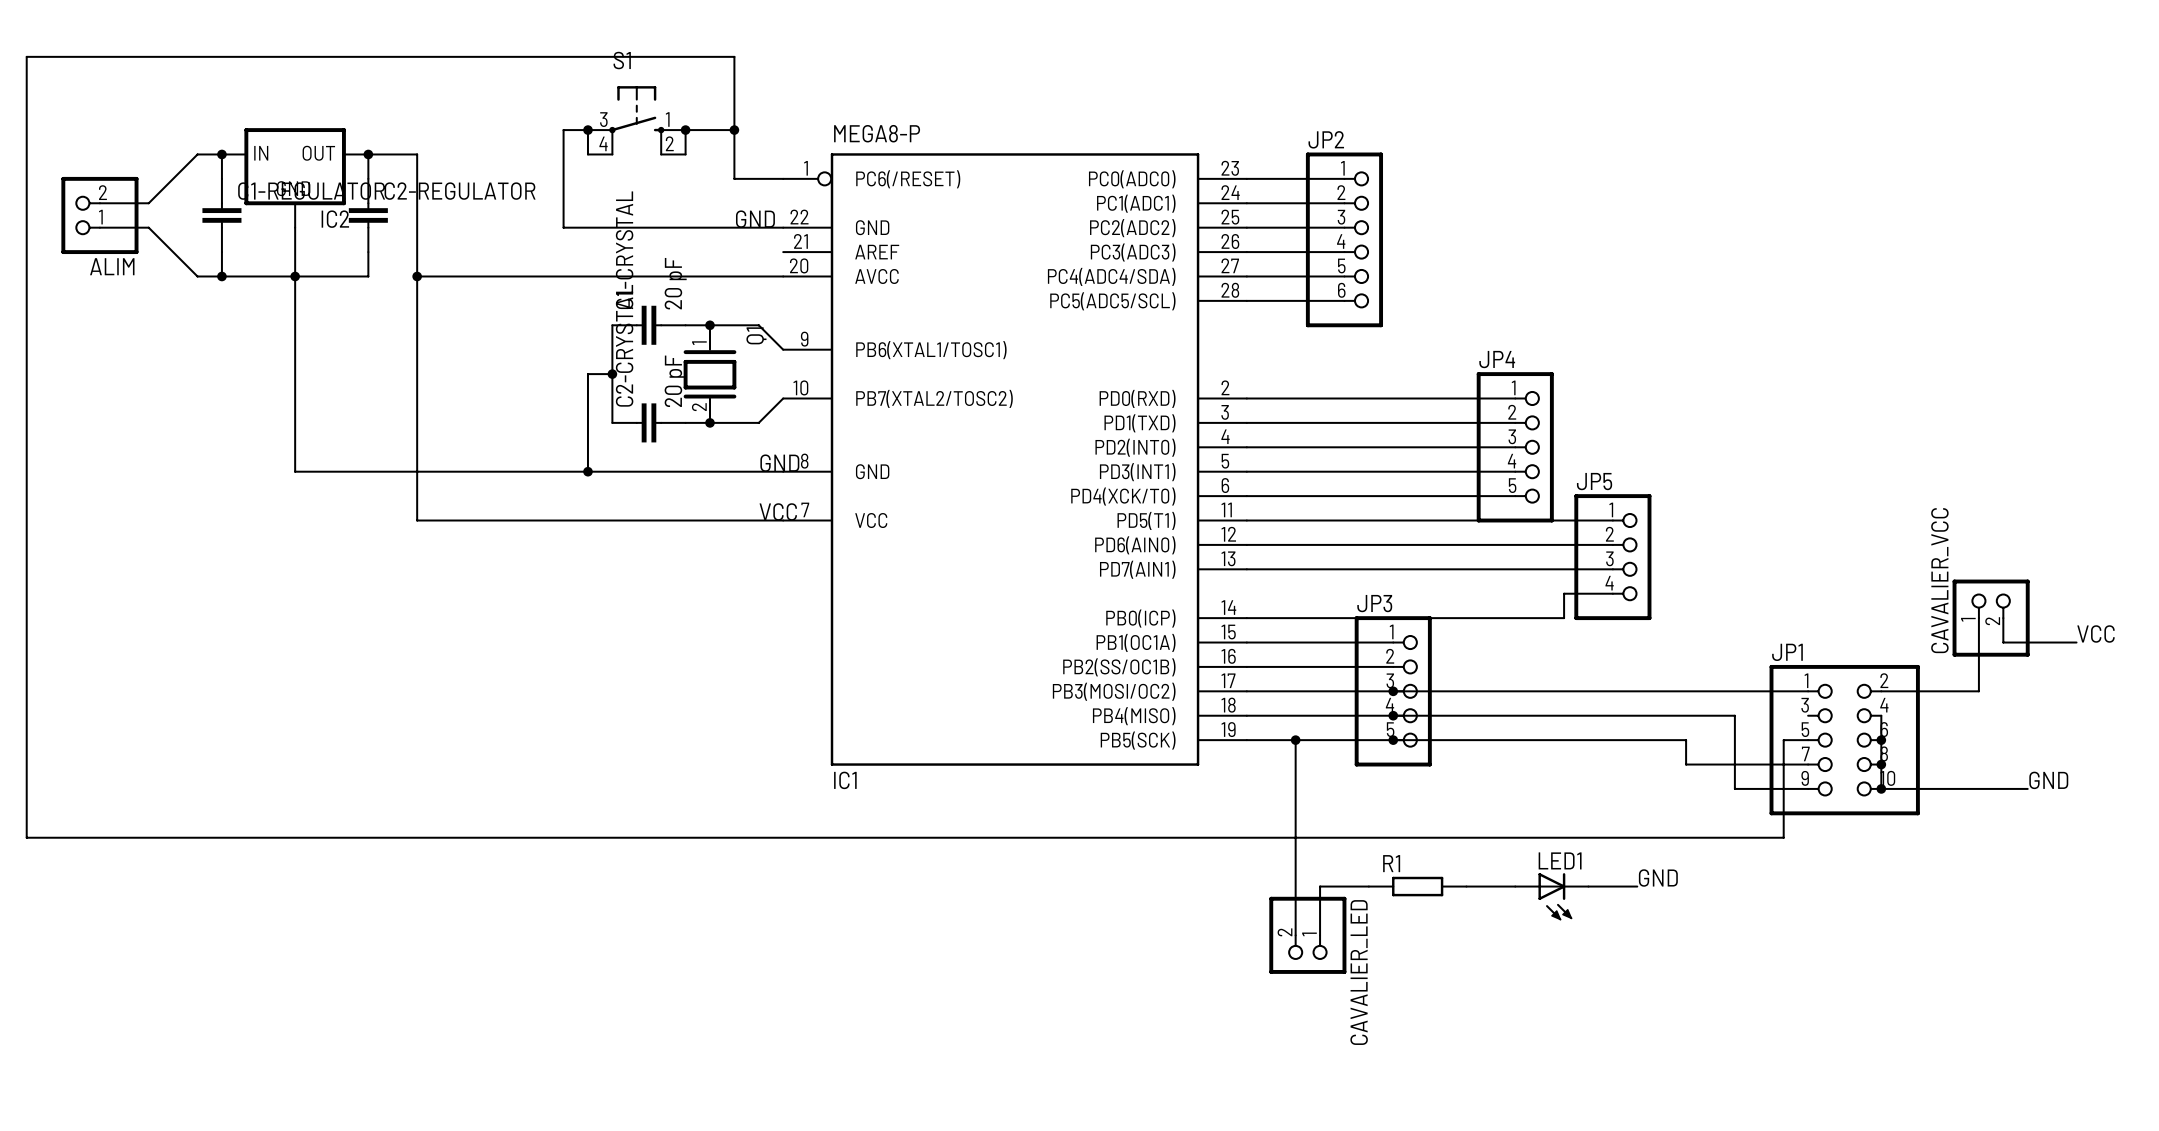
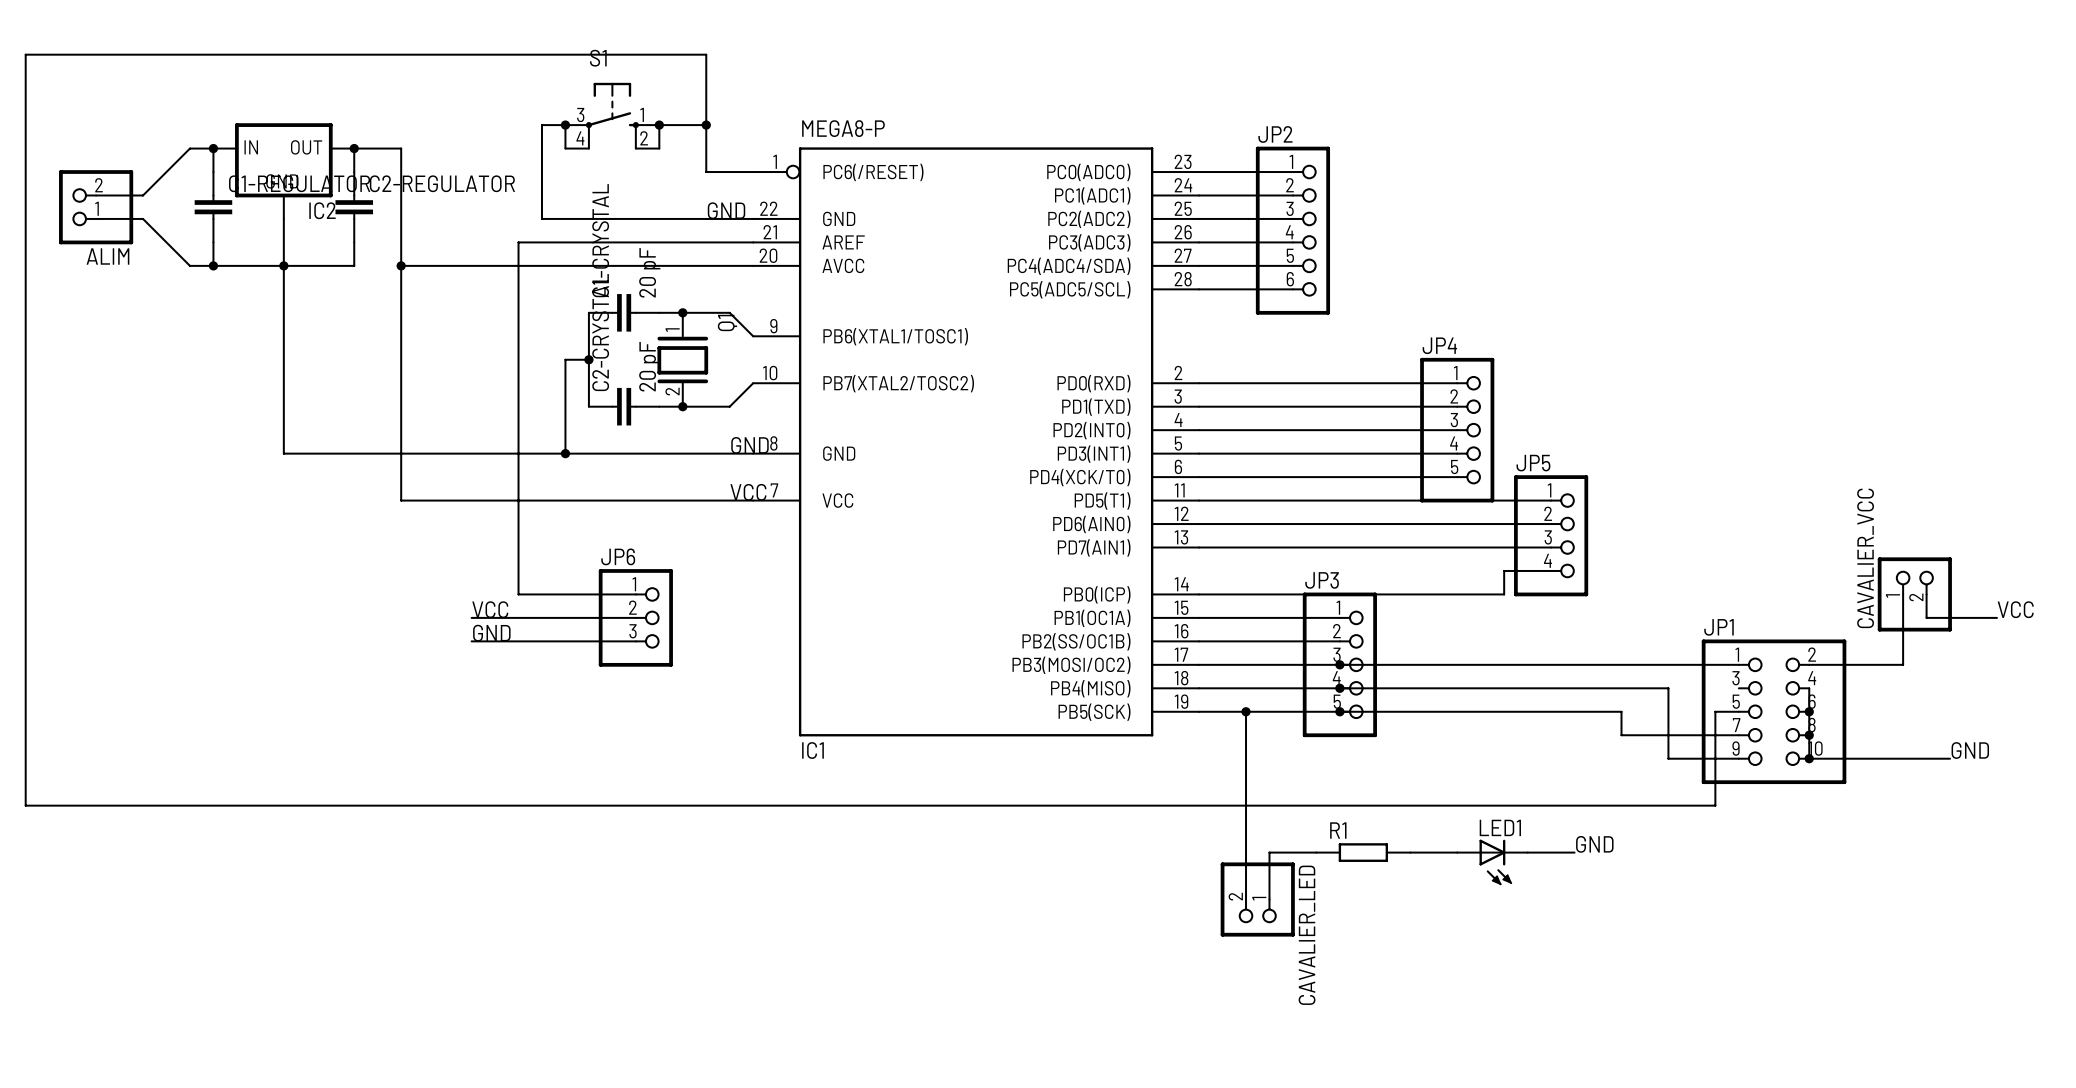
wire: none -> (753, 242) (518, 242) (518, 594) (635, 594)
label: none -> VCC (490, 609)
wire: none -> (471, 617) (635, 617)
JP6: none -> (635, 617)
label: none -> GND (491, 633)
wire: none -> (471, 641) (635, 641)

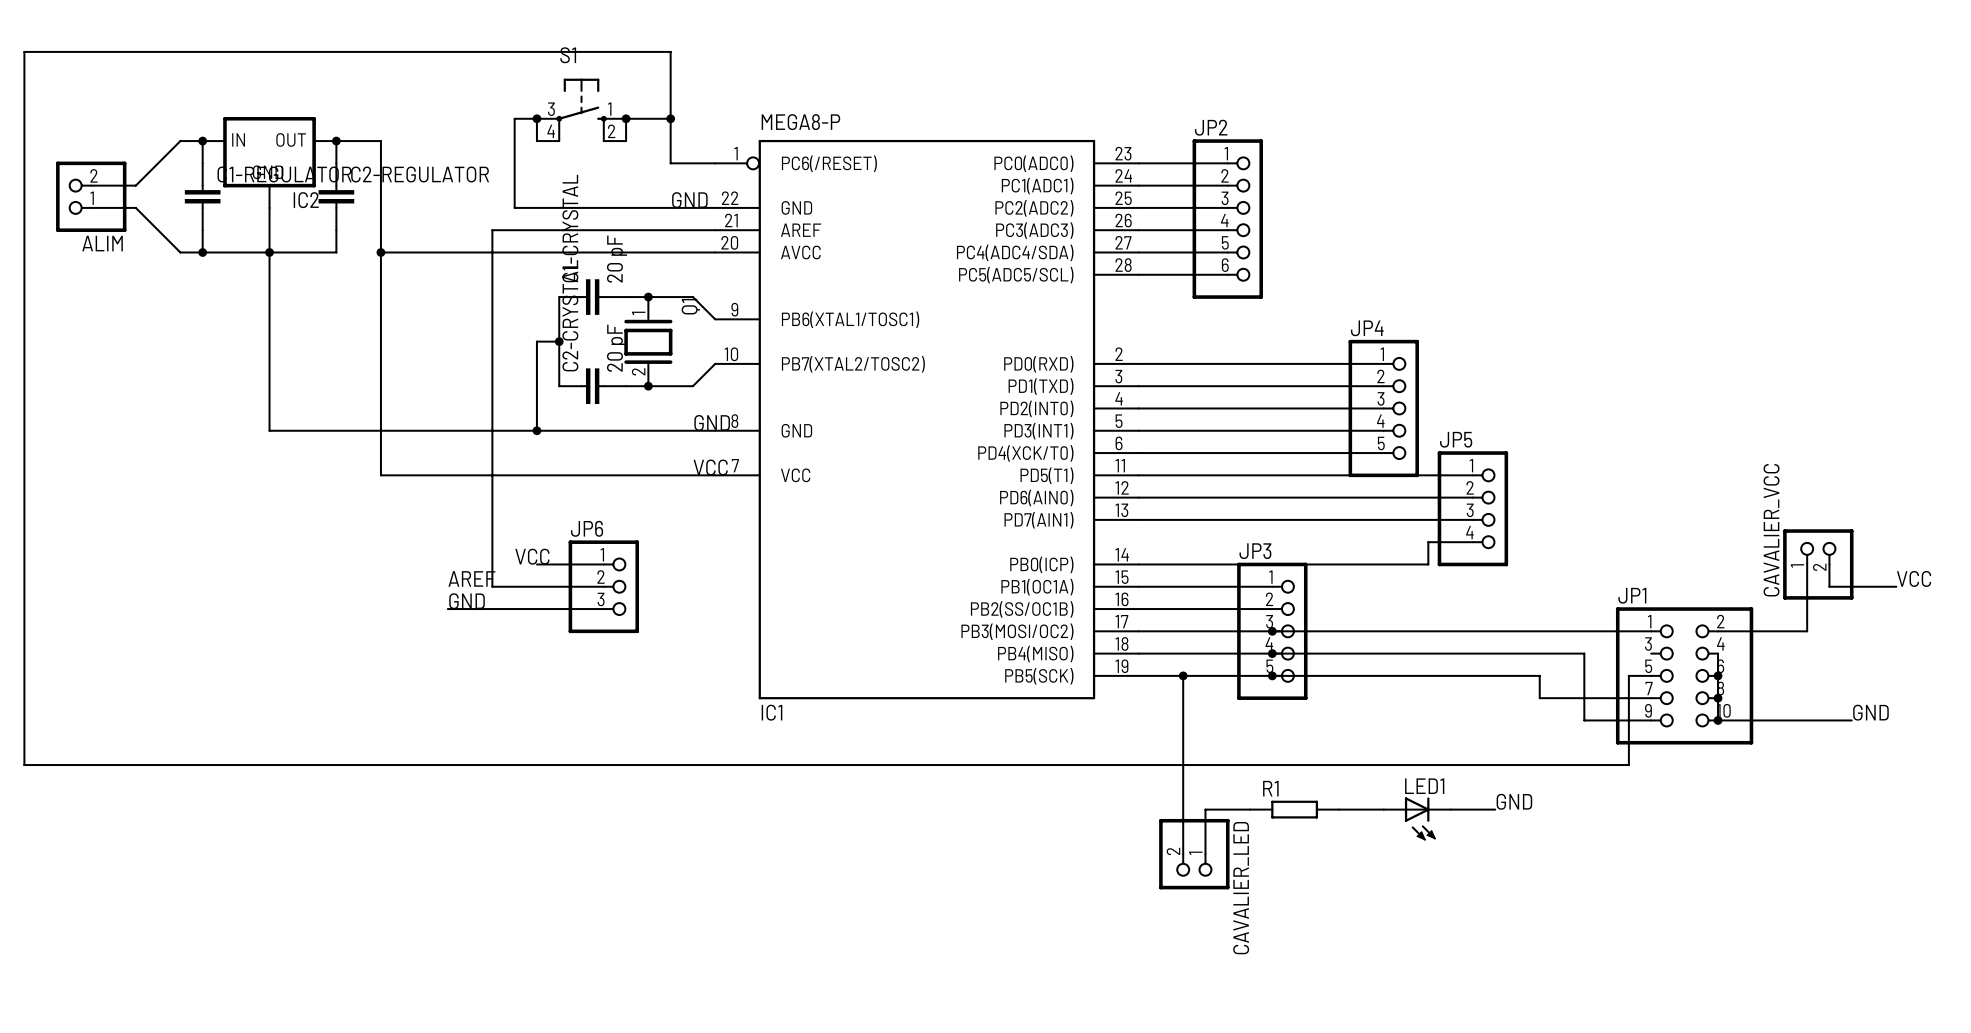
label: none -> VCC (532, 556)
wire: (518, 594) (565, 594) -> (492, 564) (492, 586)
label: VCC (490, 609) -> AREF (471, 578)
wire: (471, 617) (518, 617) -> none

